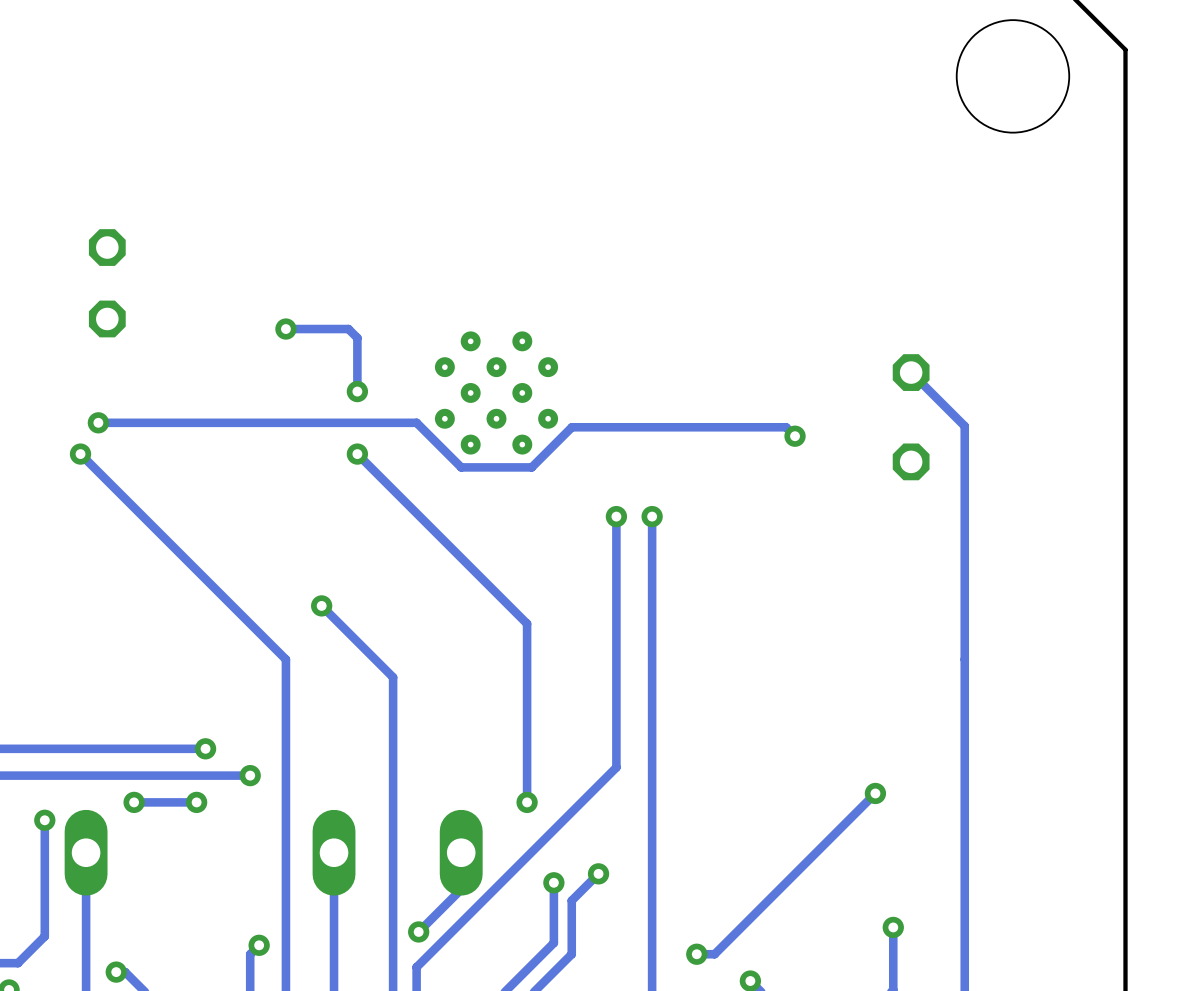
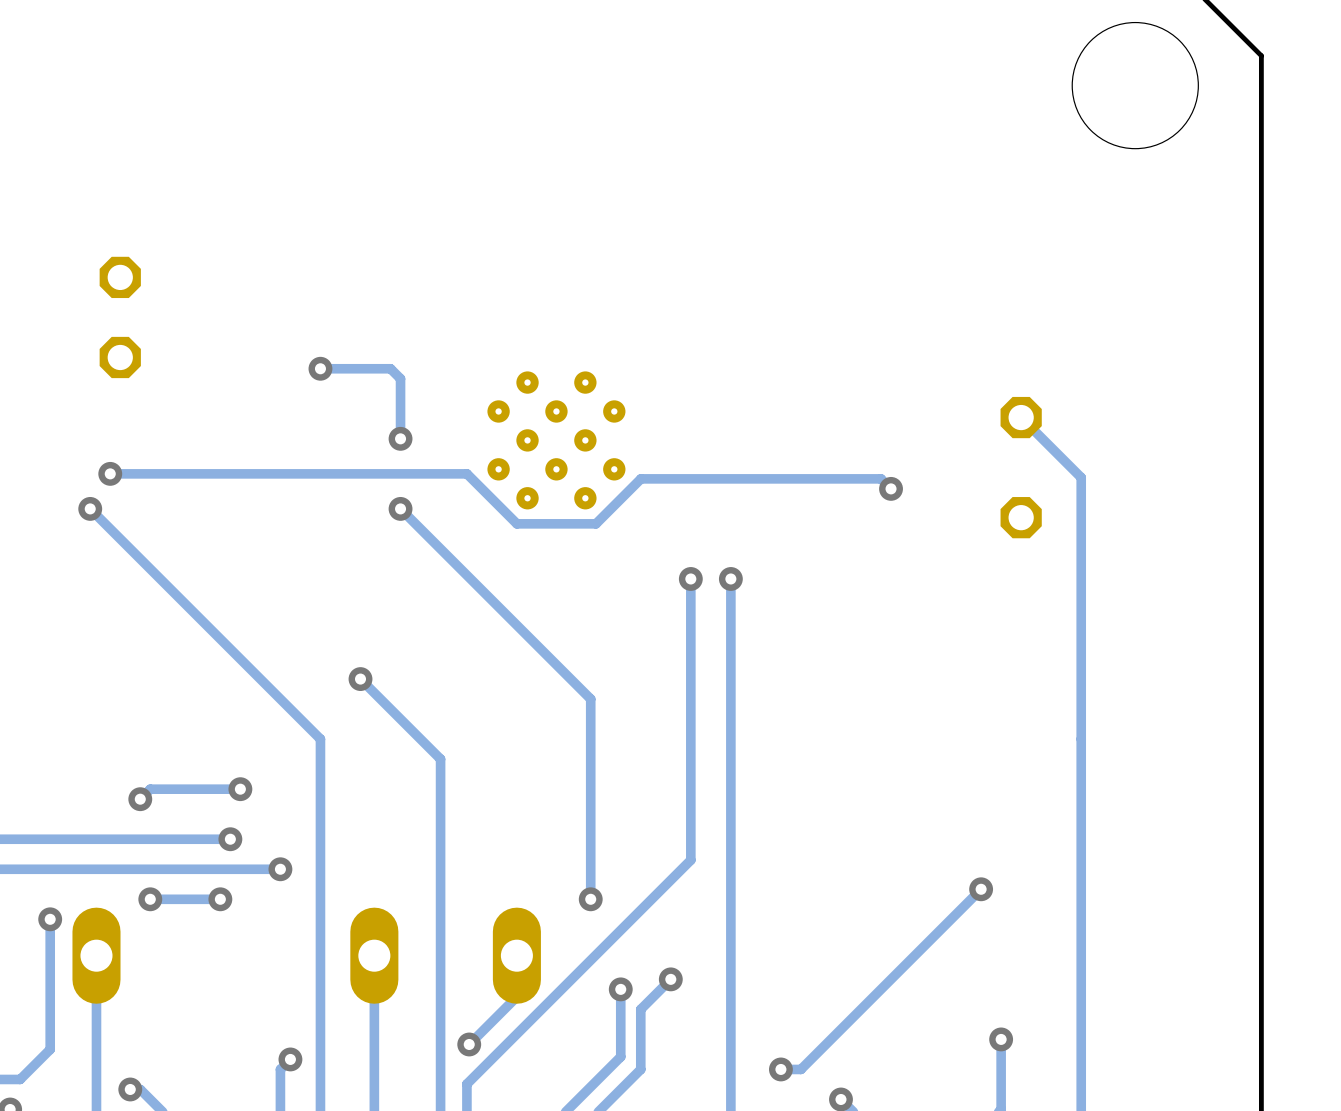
track: none -> (240, 789) (150, 789) (140, 799)
via: none -> (240, 789)
via: none -> (140, 799)

